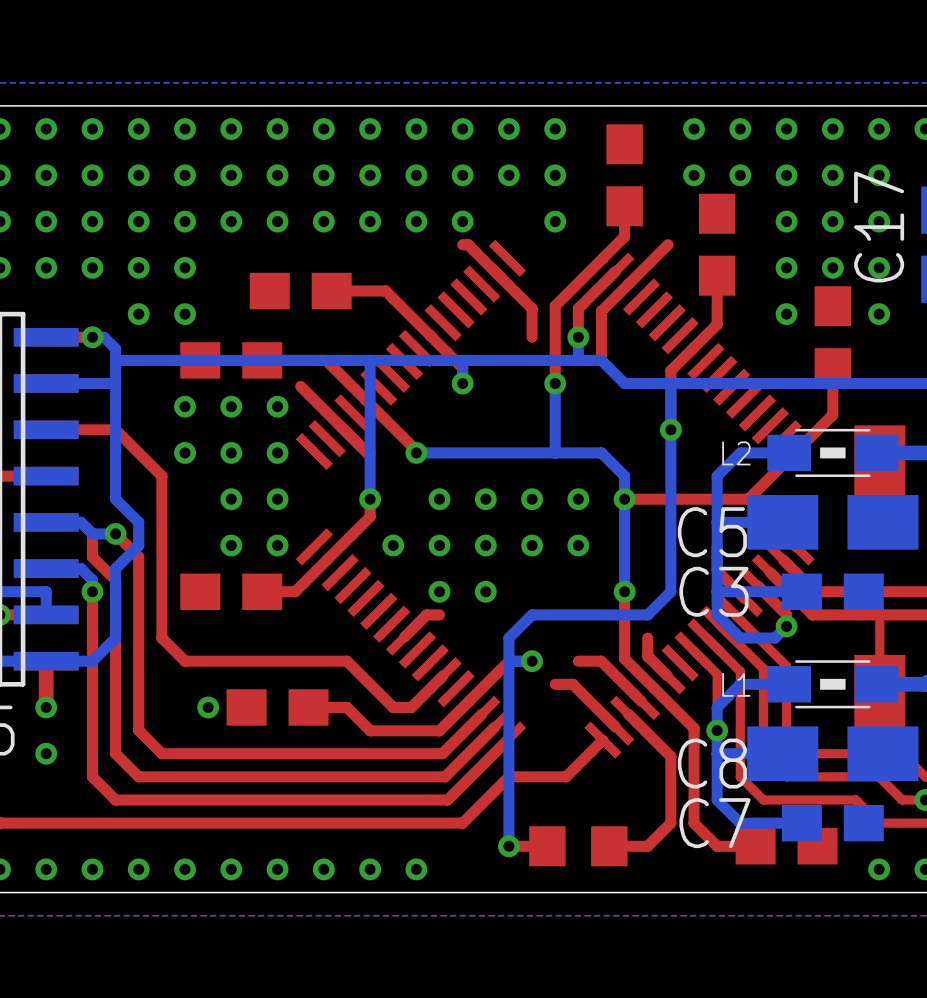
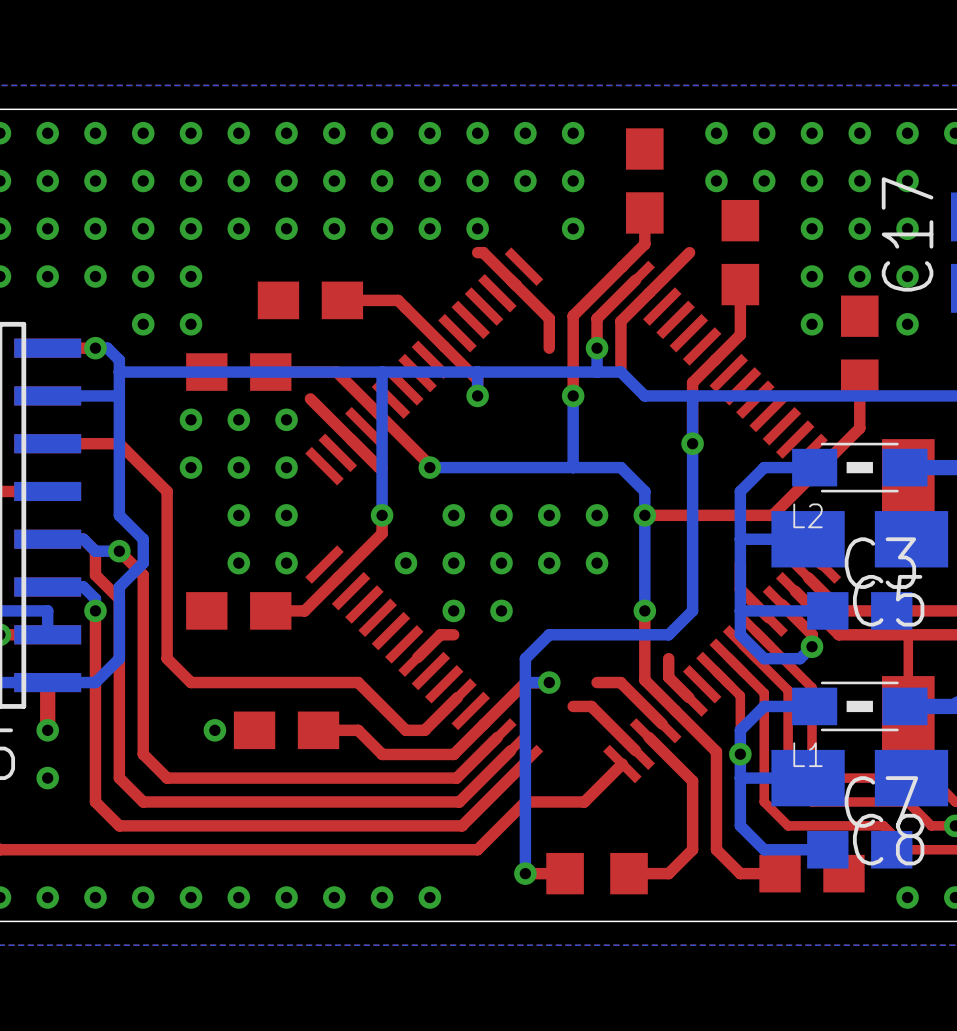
L2 name position: L2 (736, 453) -> L2 (808, 515)
C5 name position: C5 (712, 532) -> C5 (888, 600)
C3 name position: C3 (713, 591) -> C3 (880, 563)
L1 name position: L1 (736, 684) -> L1 (808, 754)
C8 name position: C8 (712, 763) -> C8 (888, 839)
C7 name position: C7 (714, 823) -> C7 (881, 801)

